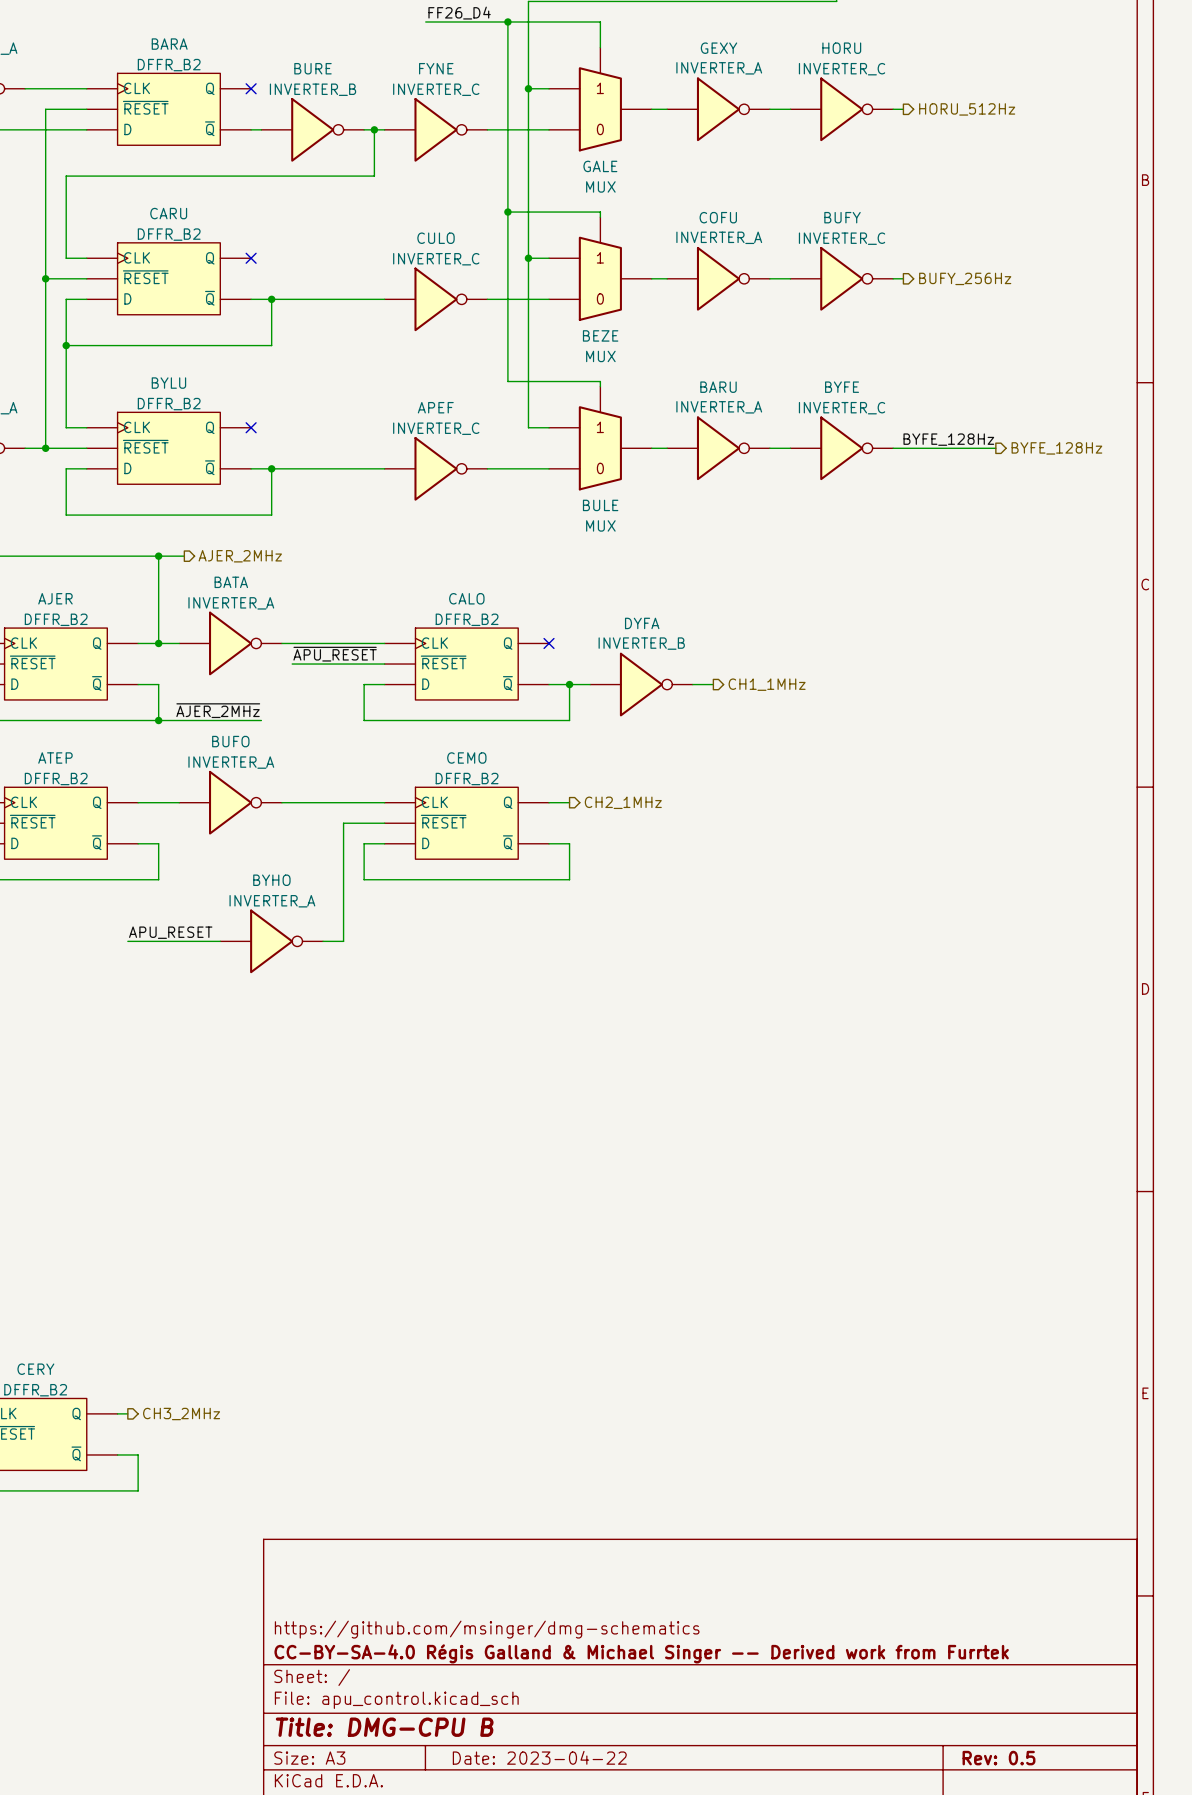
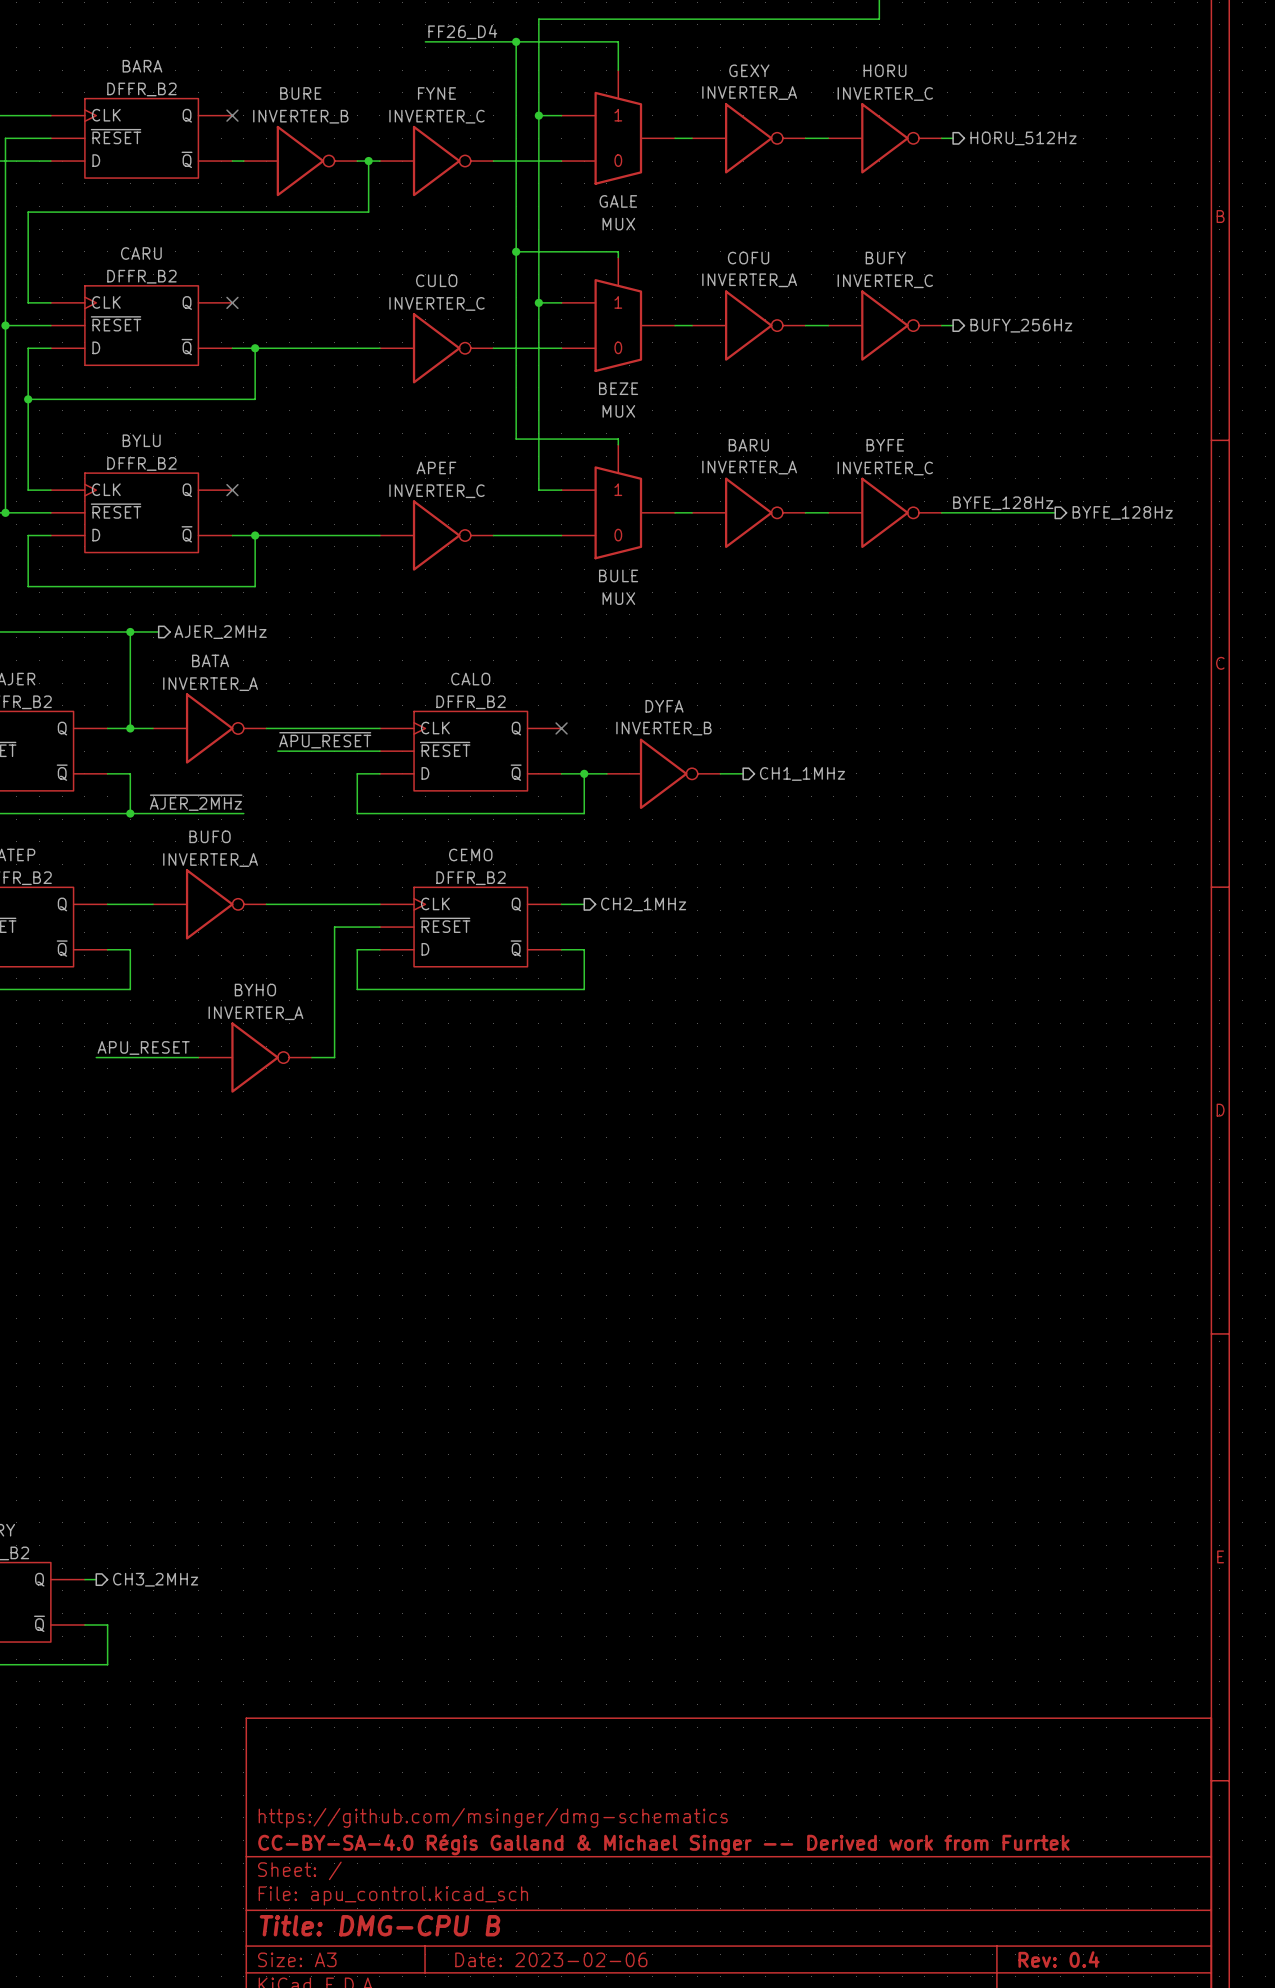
title block: Date: 2023-04-22 (539, 1757) -> Date: 2023-02-06 (551, 1959)
title block: Rev: 0.5 (998, 1758) -> Rev: 0.4 (1059, 1959)

